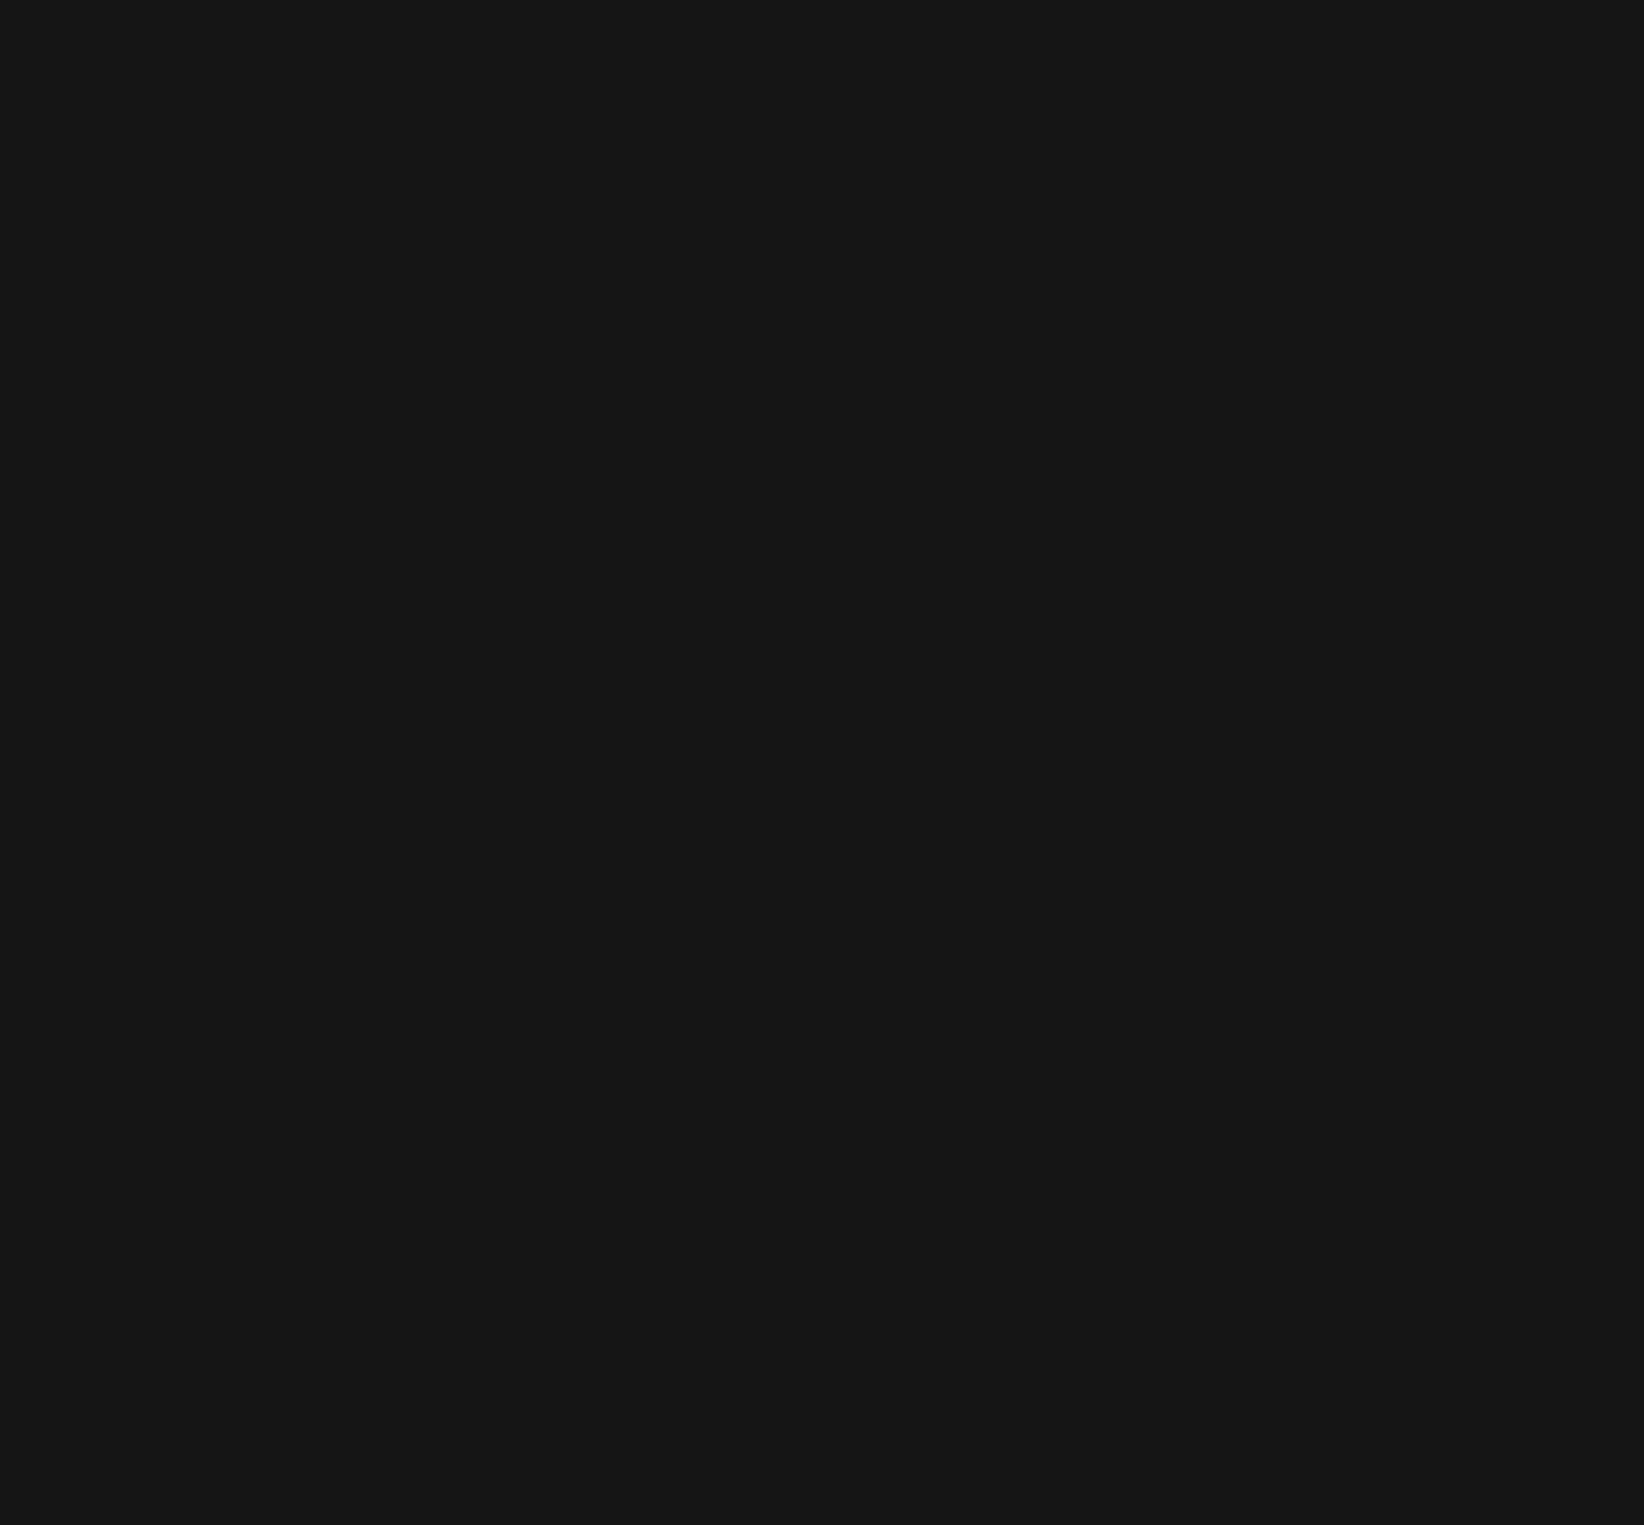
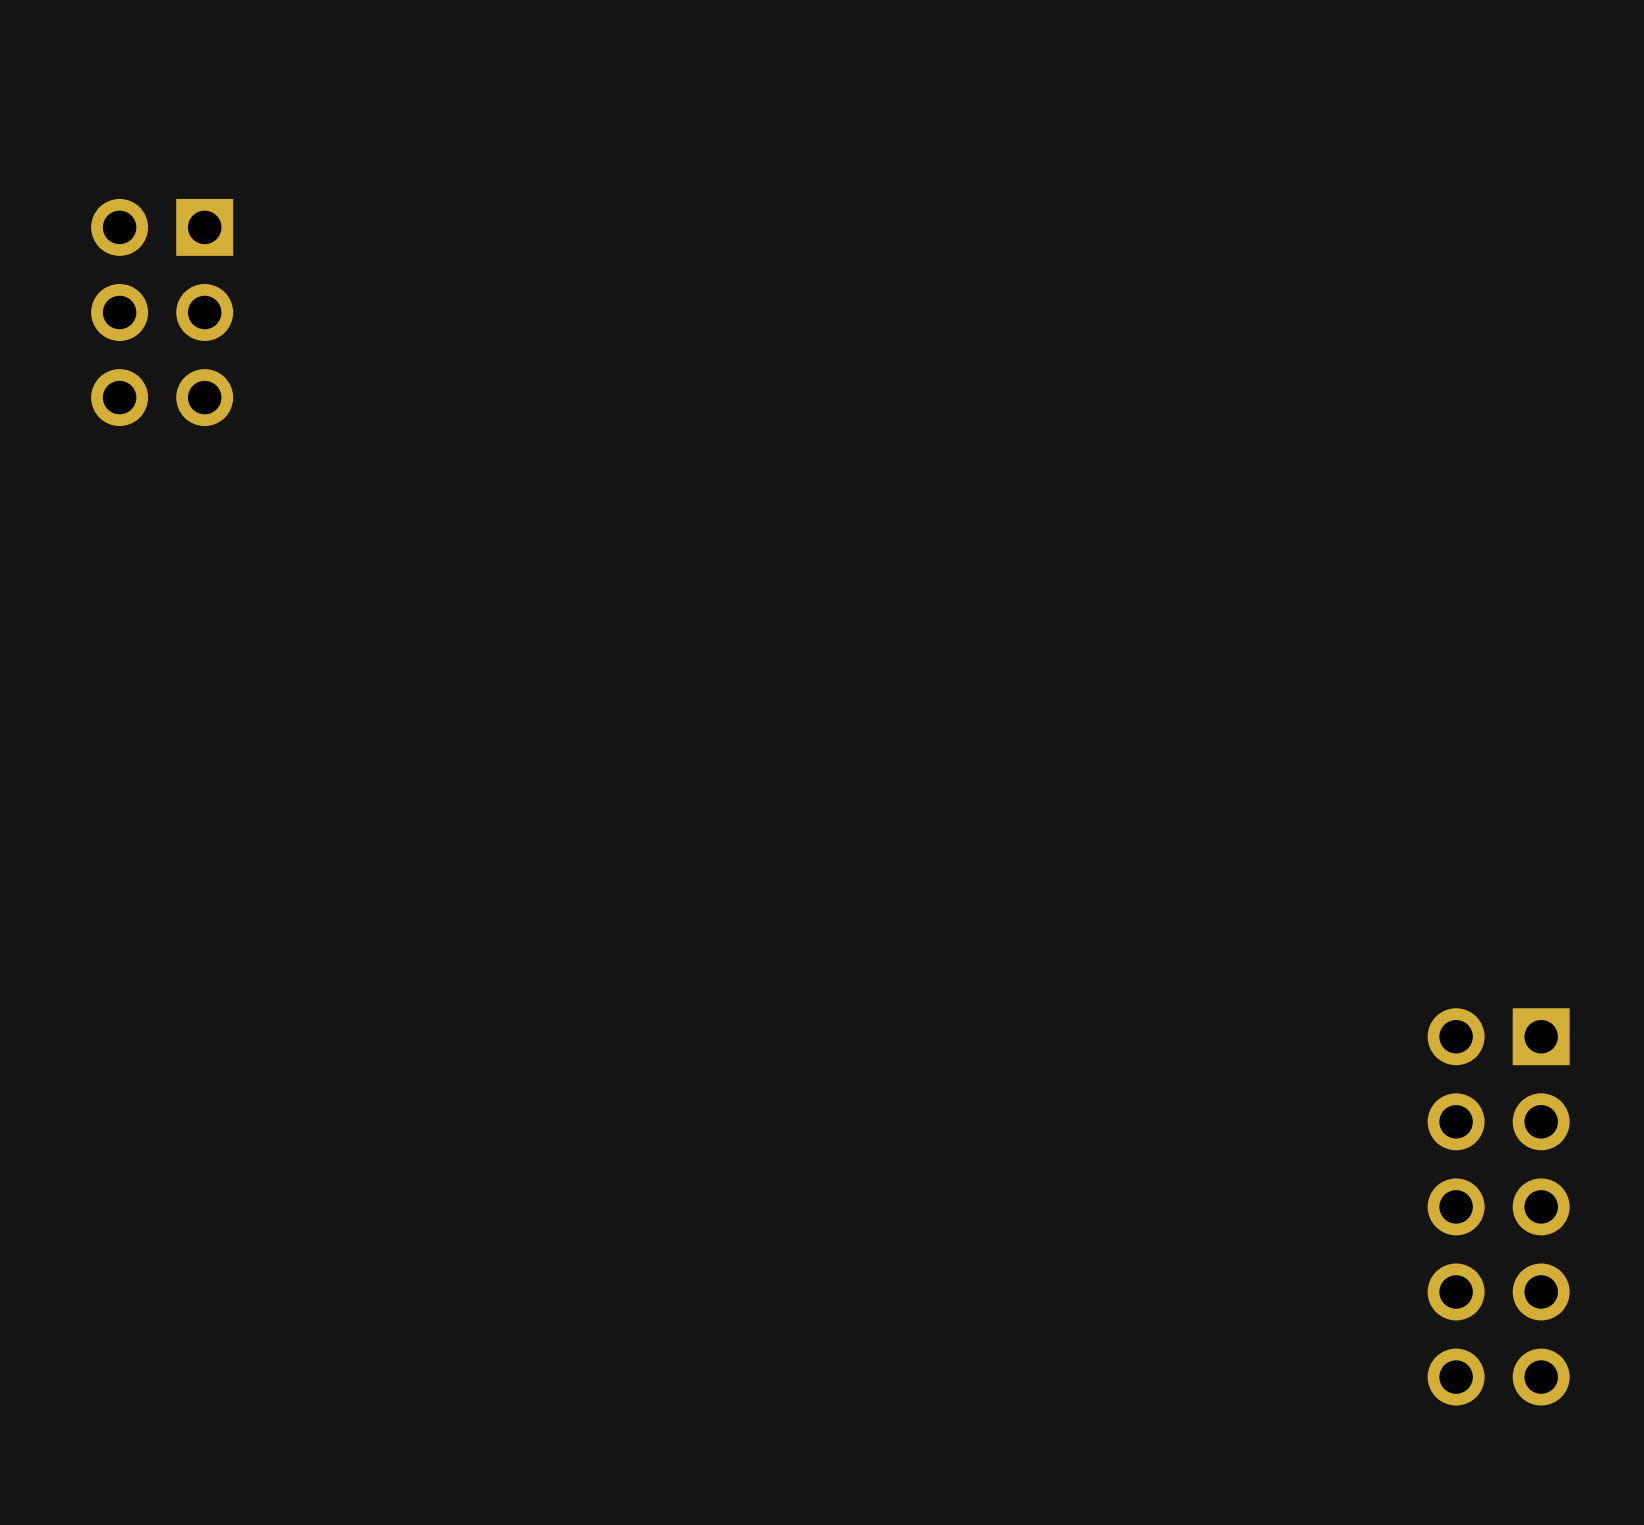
part: none -> (162, 312)
part: none -> (1498, 1206)

